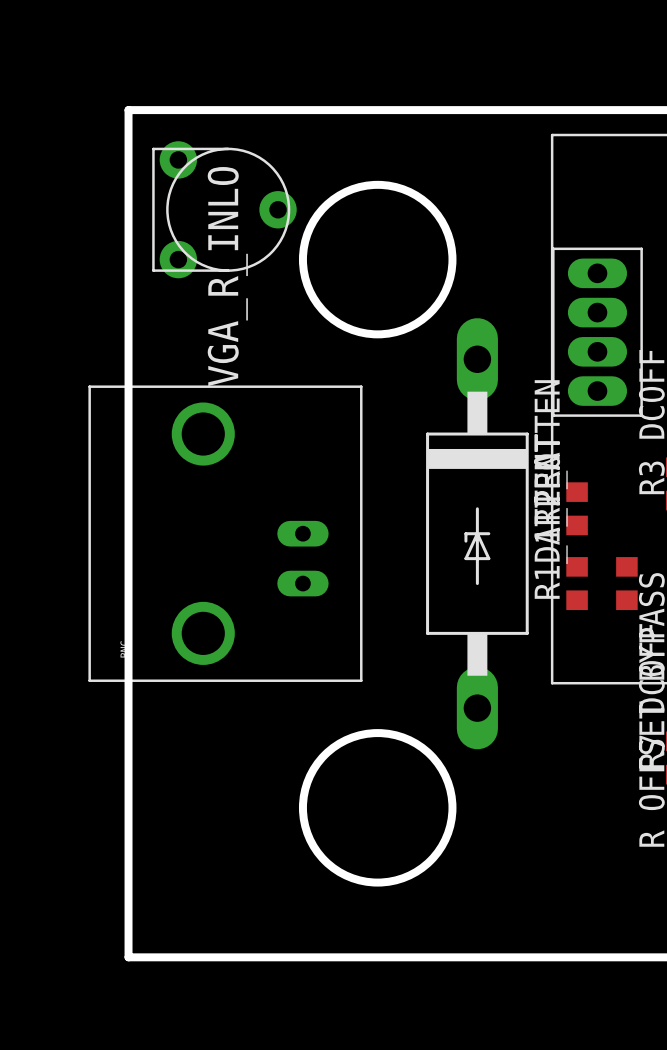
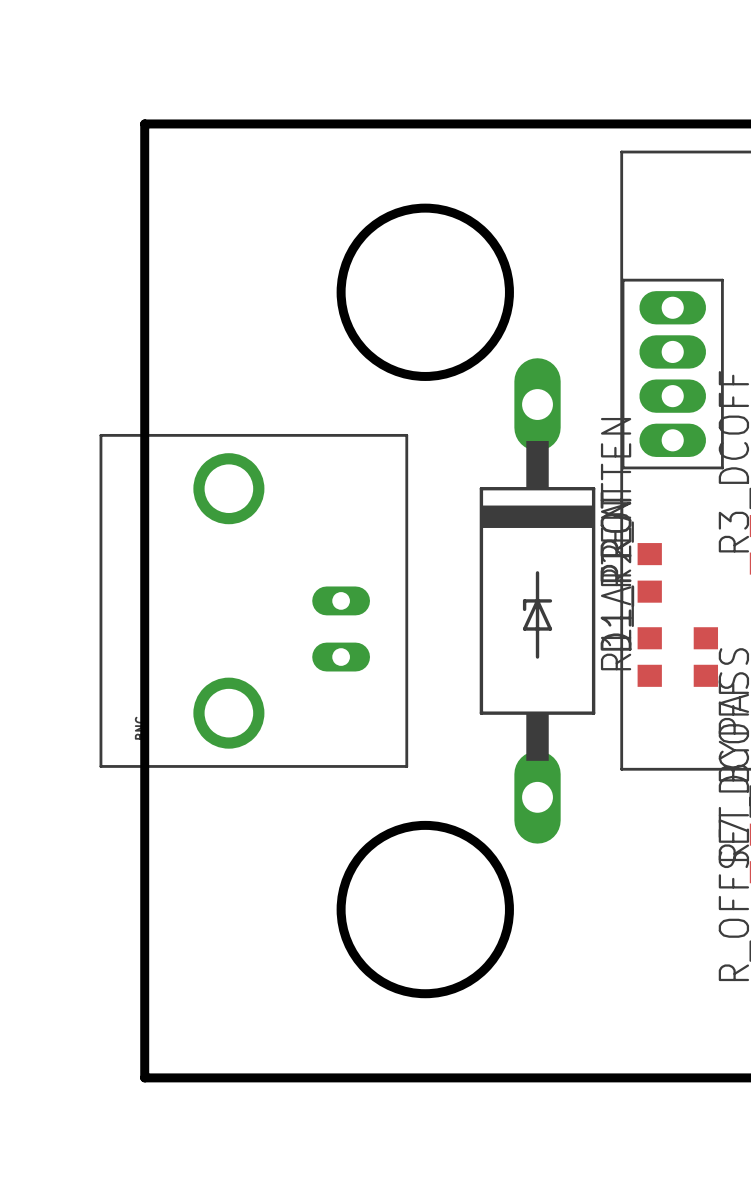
VGA_R_INLO: (224, 209) -> none

